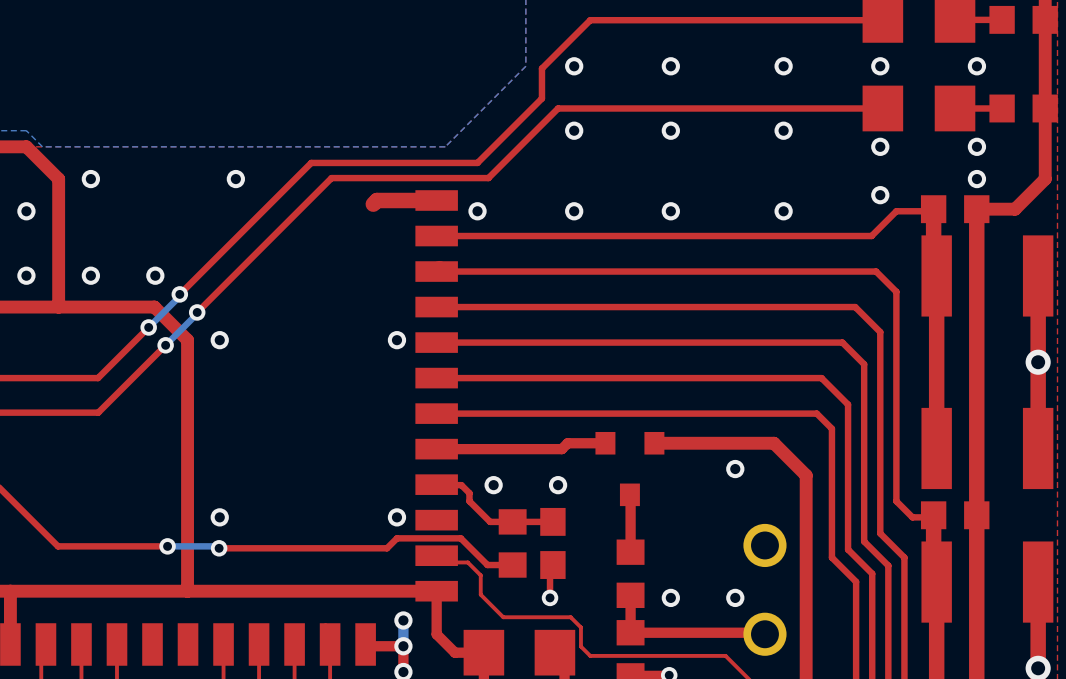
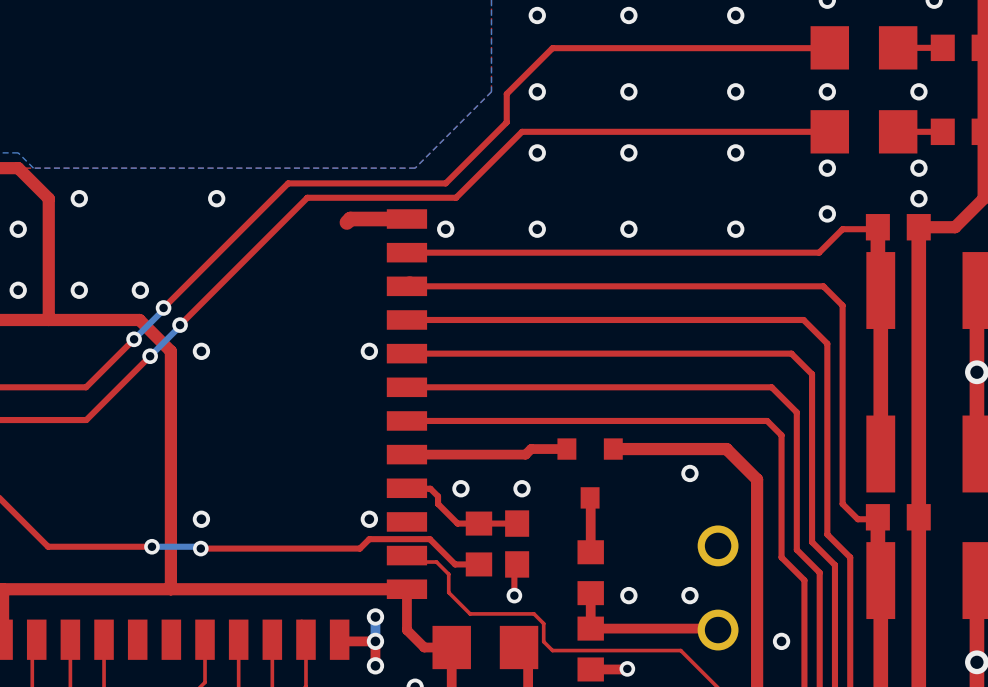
via: none -> (781, 641)

